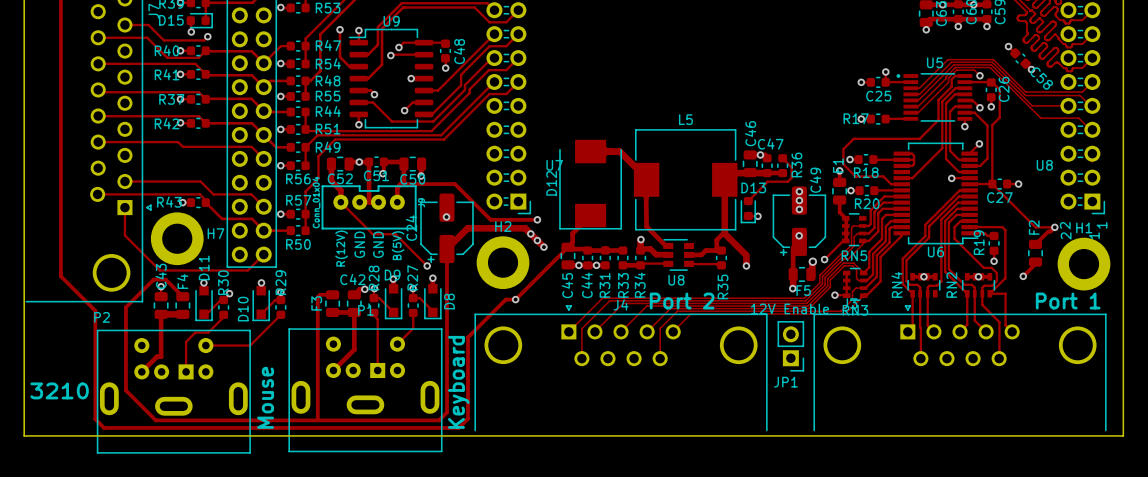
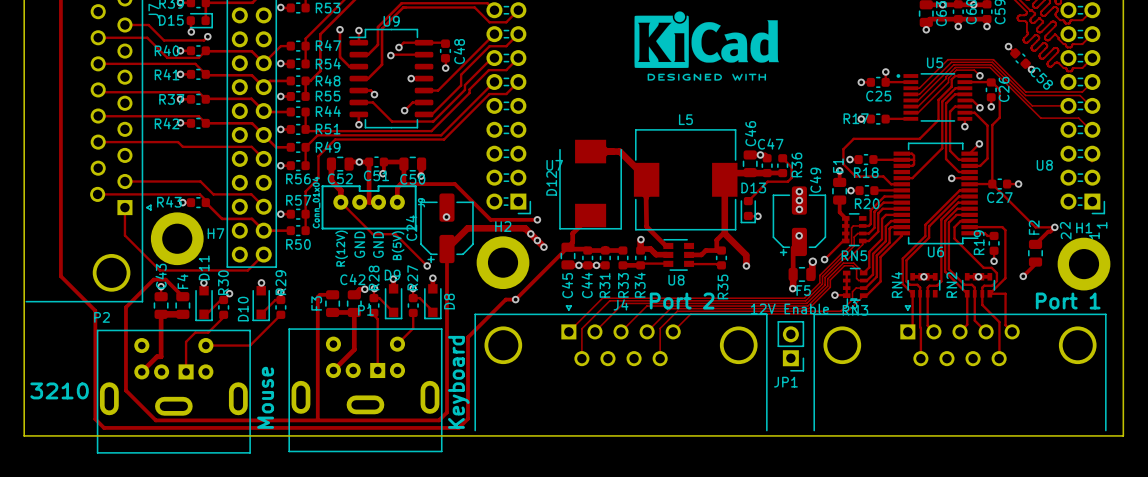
drawing: none -> [634, 11, 780, 81]

